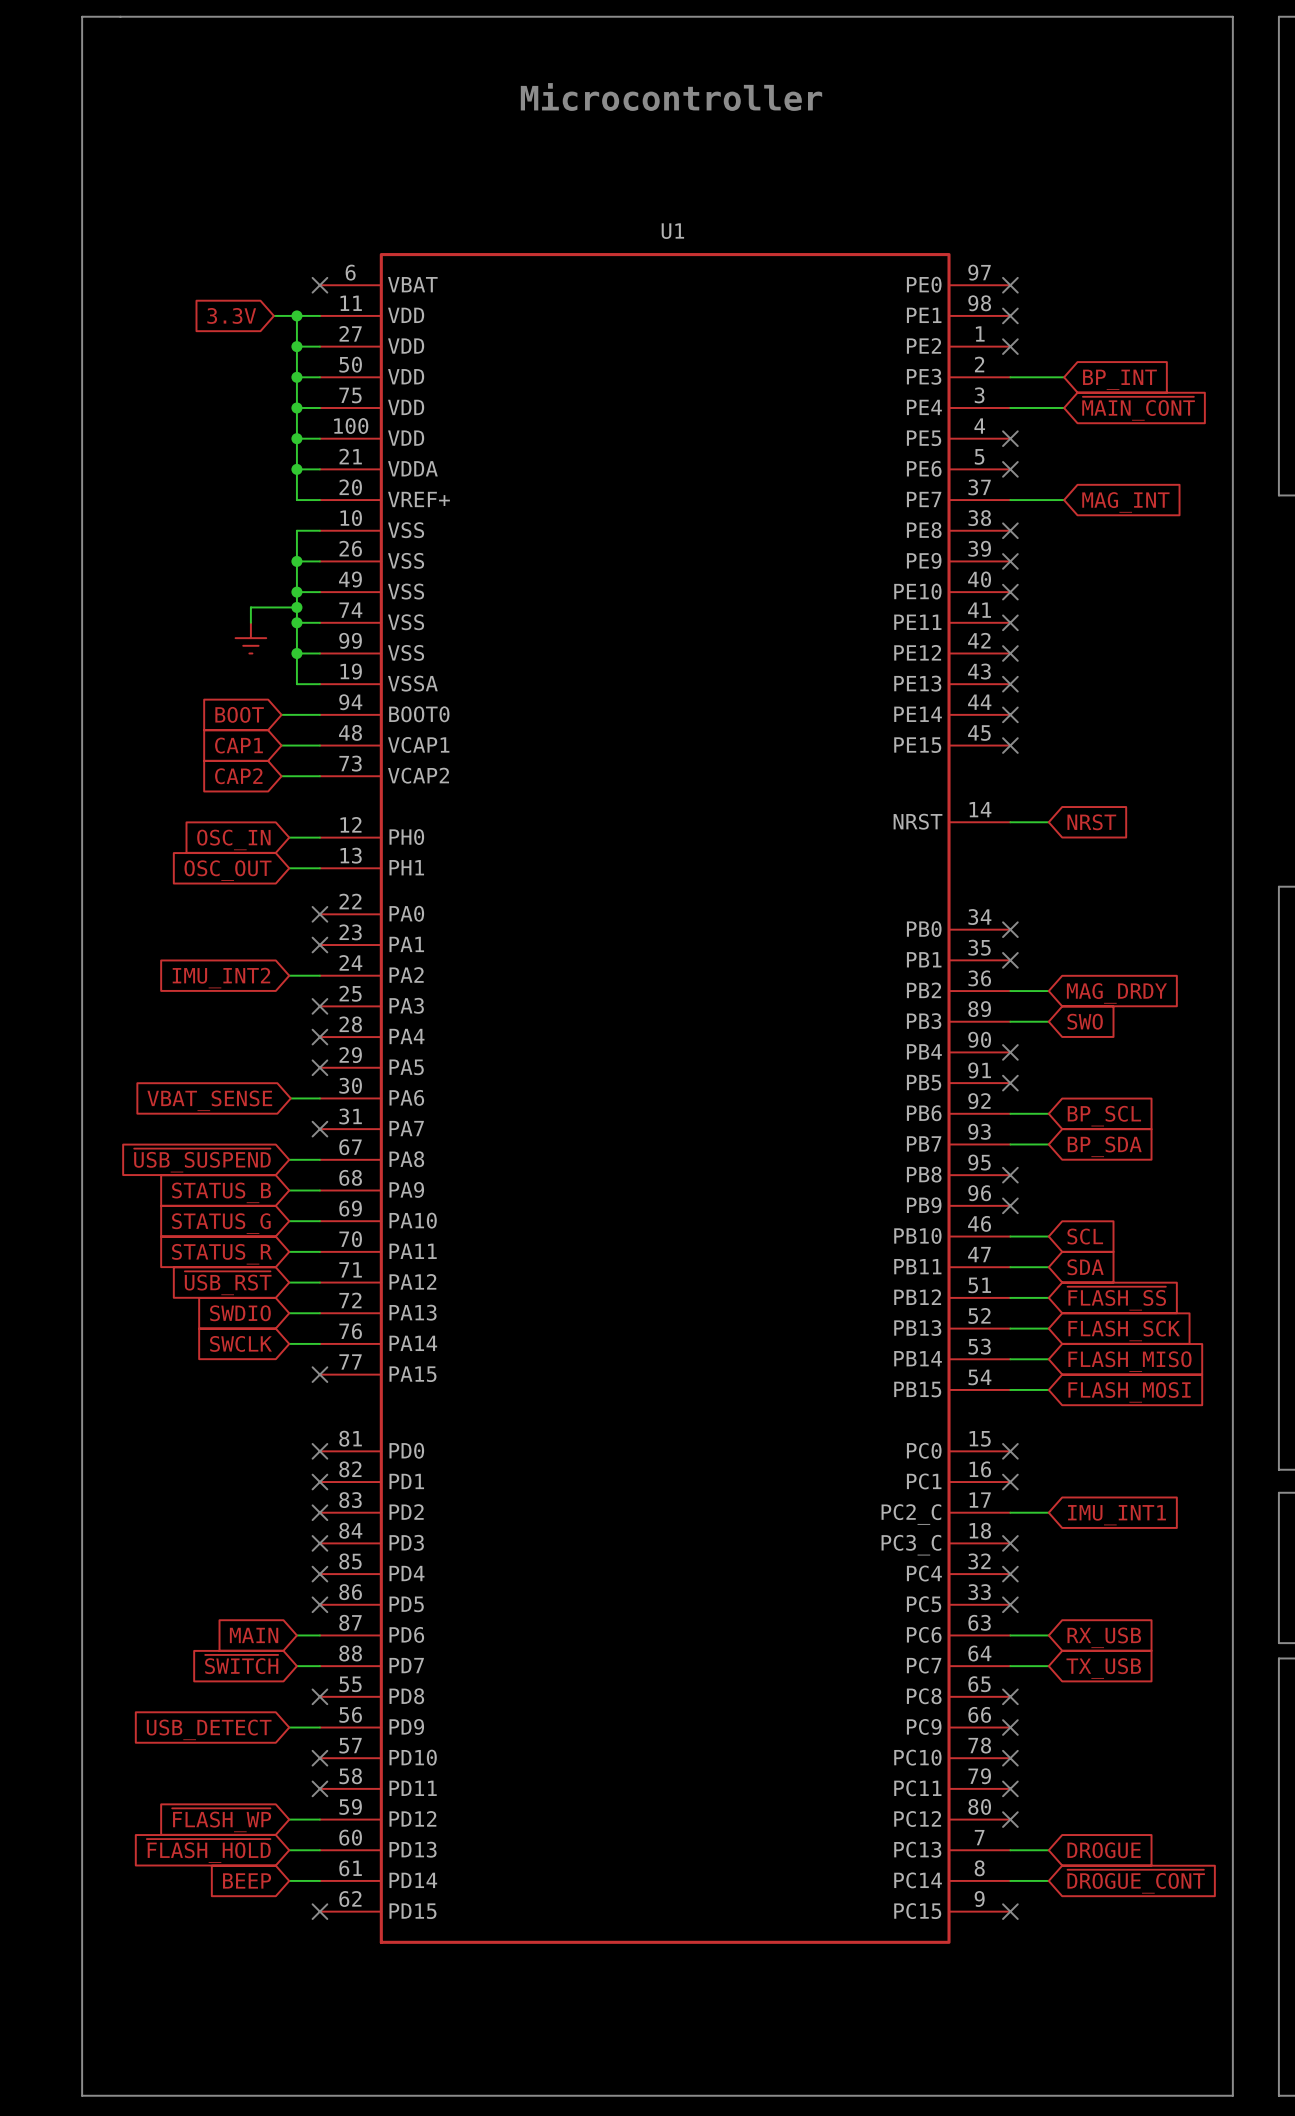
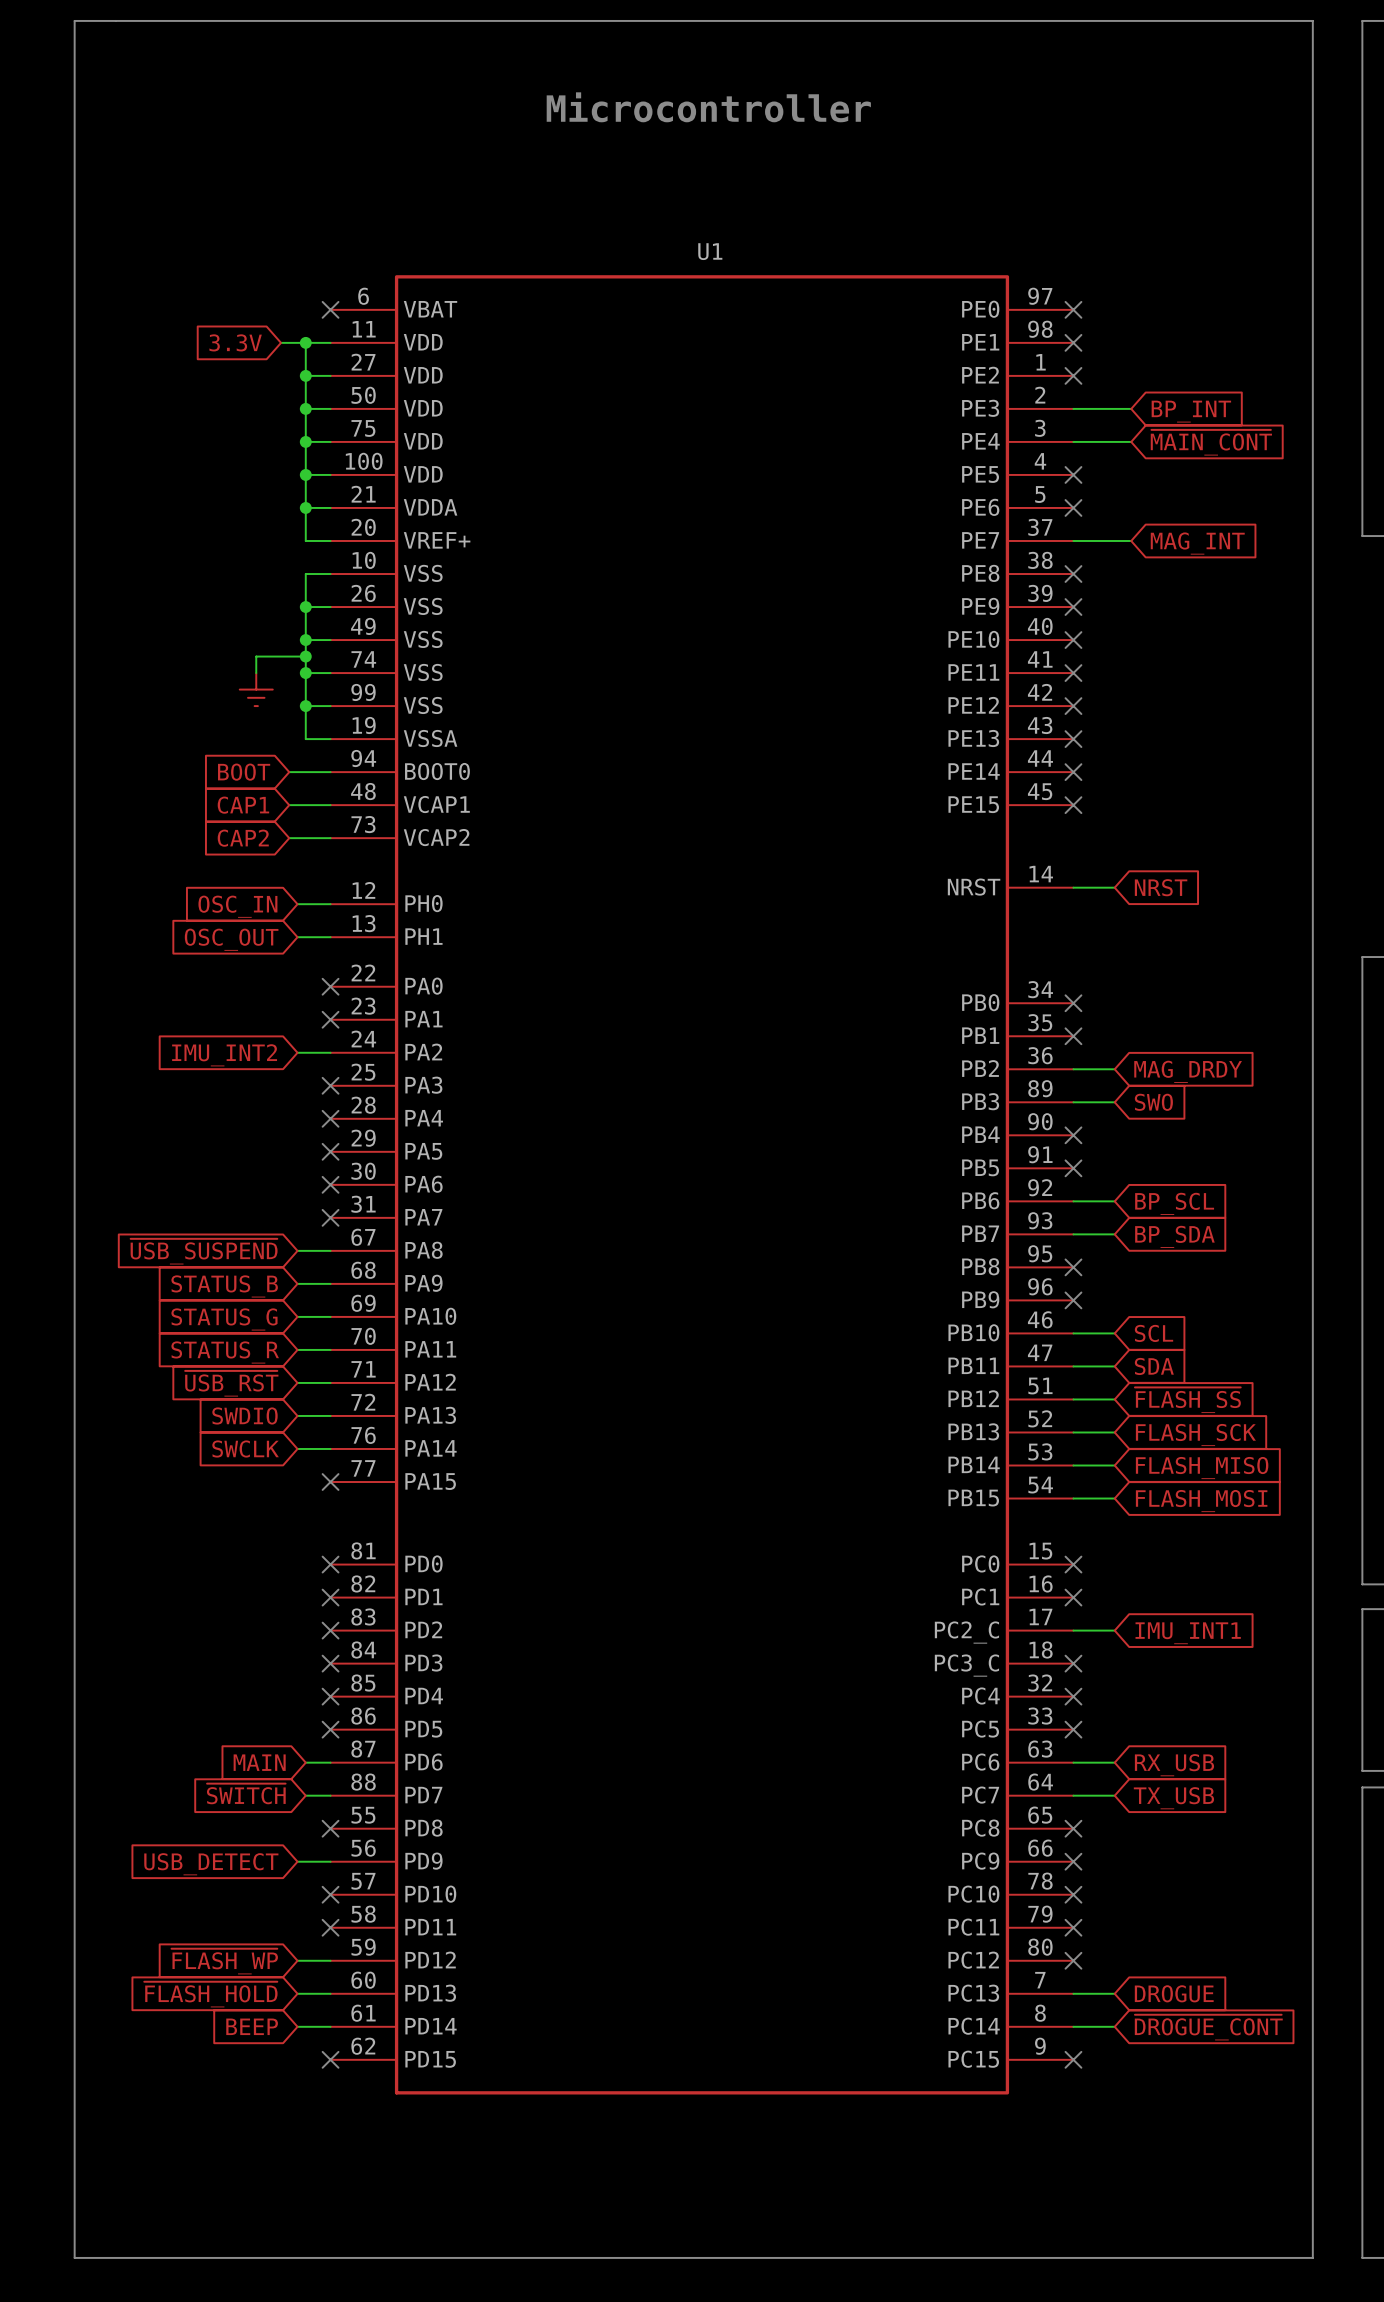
wire: (290, 1098) (319, 1098) -> none
no-connect mark: none -> (330, 1184)
global label: VBAT_SENSE (209, 1100) -> none

